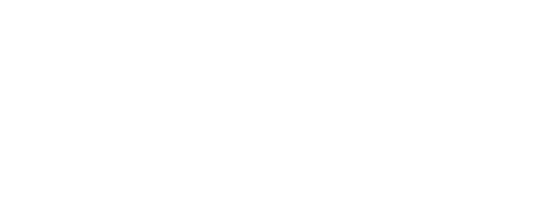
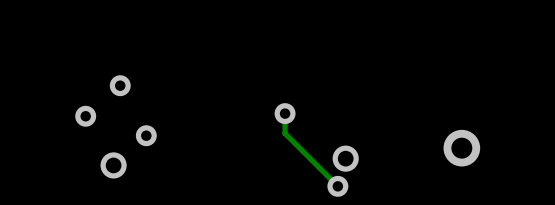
via: none -> (120, 85)
track: none -> (285, 113) (285, 133) (337, 186)
via: none -> (285, 113)
via: none -> (85, 116)
via: none -> (146, 135)
via: none -> (461, 148)
via: none -> (345, 158)
via: none -> (113, 165)
via: none -> (337, 186)

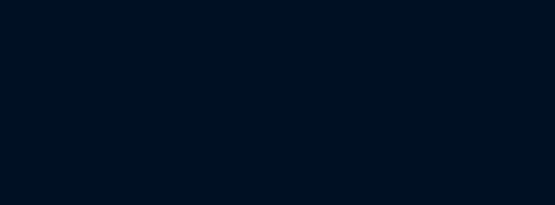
via: (120, 85) -> none
track: (285, 113) (285, 133) (337, 186) -> none
via: (285, 113) -> none
via: (85, 116) -> none
via: (146, 135) -> none
via: (461, 148) -> none
via: (345, 158) -> none
via: (113, 165) -> none
via: (337, 186) -> none

